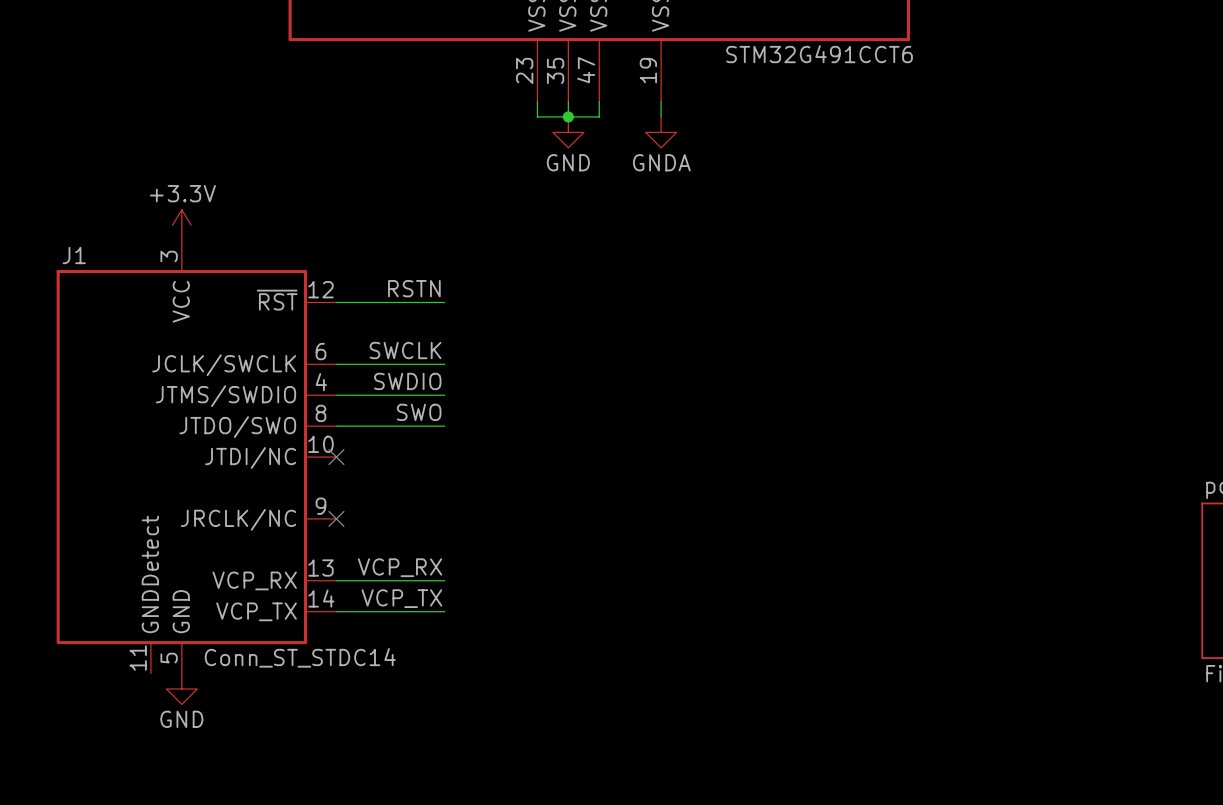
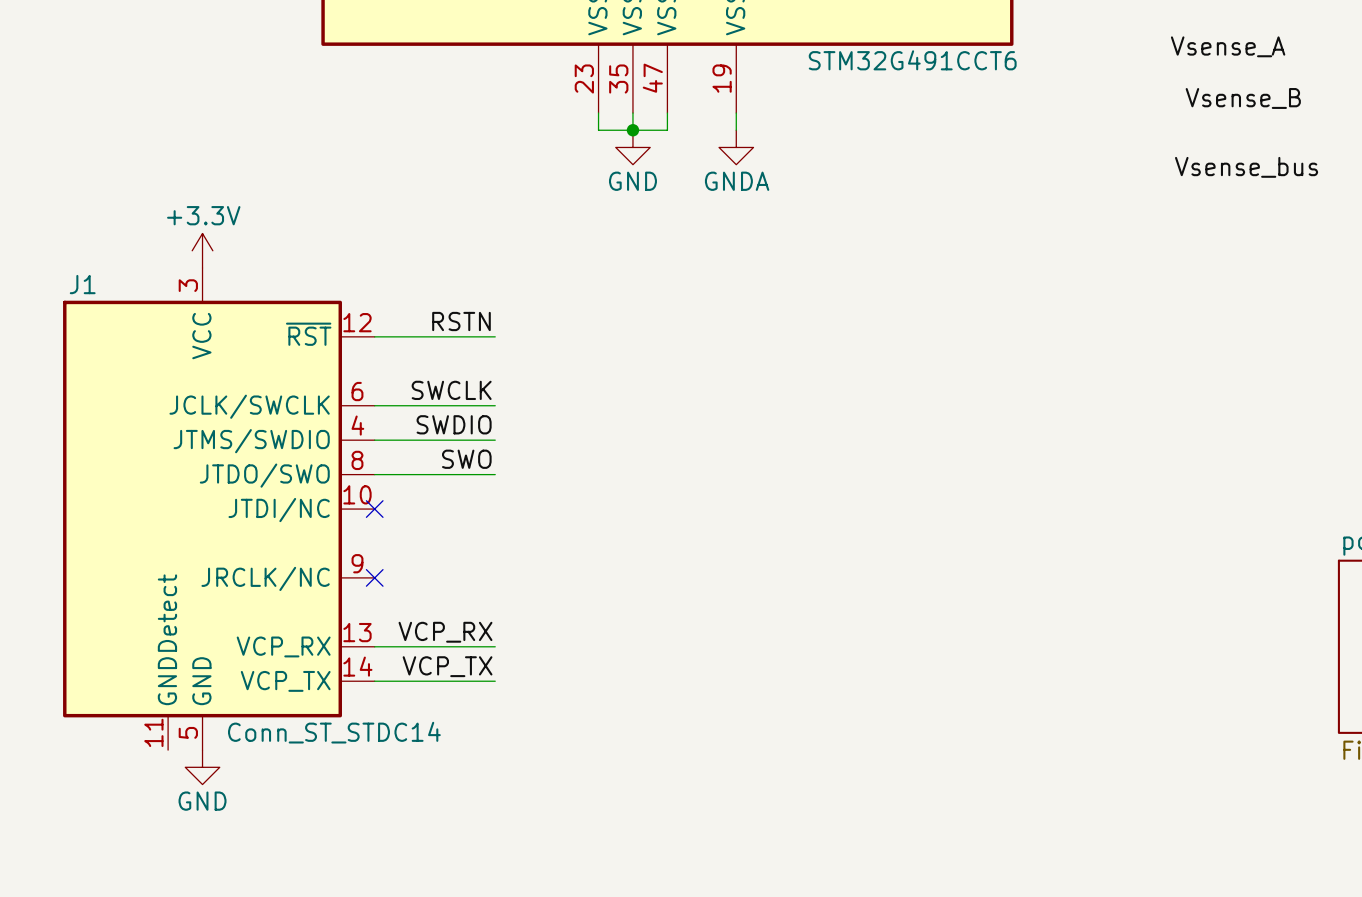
label: none -> Vsense_A (1228, 46)
label: none -> Vsense_B (1243, 98)
label: none -> Vsense_bus (1246, 167)

